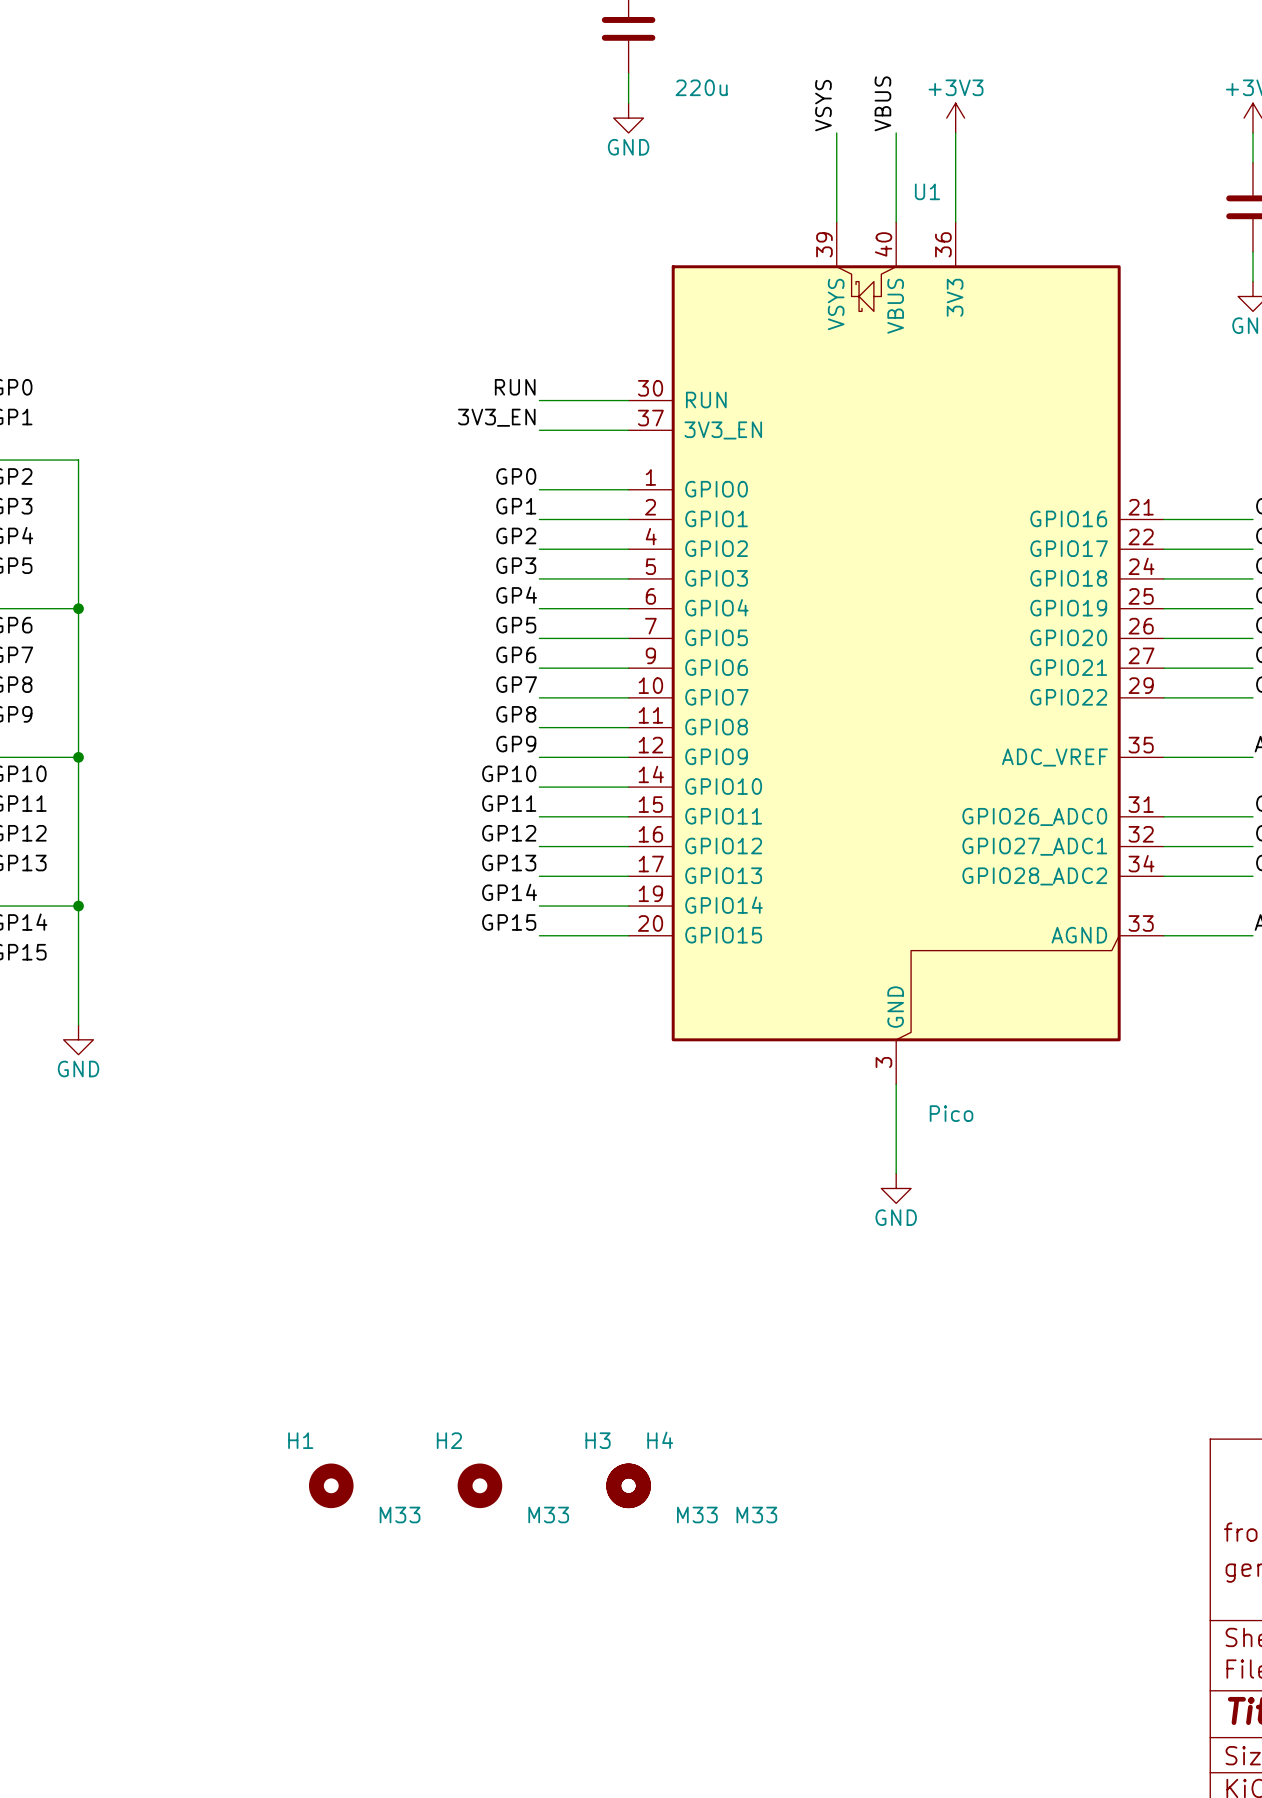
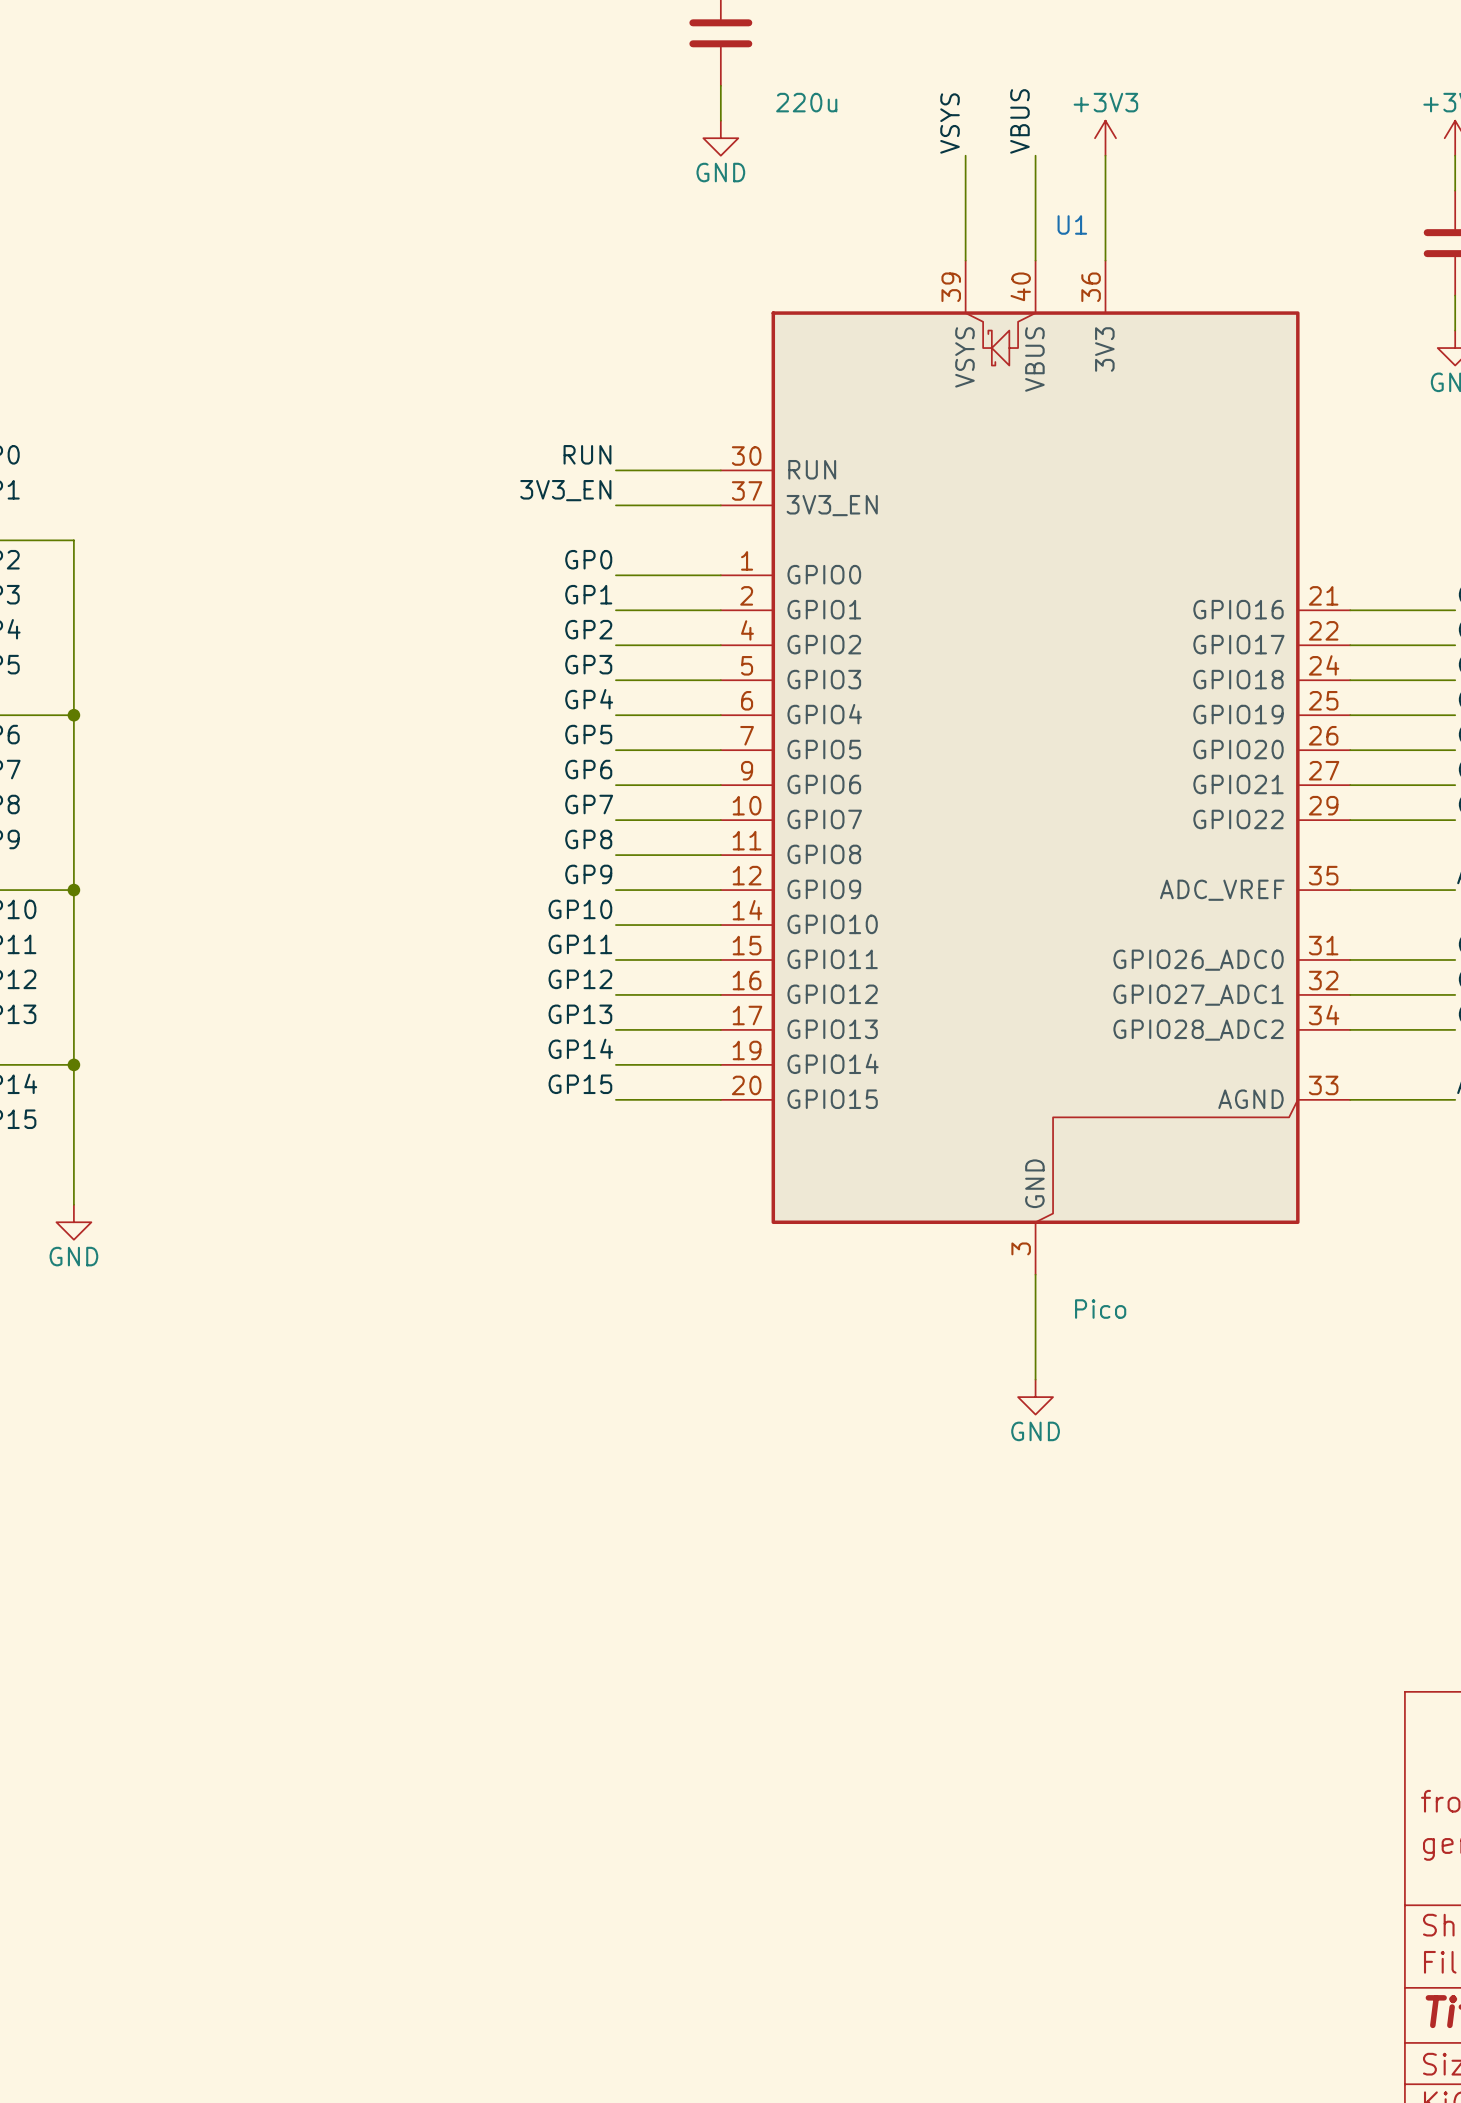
H1: M33 (331, 1485) -> none
H2: M33 (479, 1485) -> none
H3: M33 (628, 1485) -> none
H4: M33 (628, 1485) -> none

